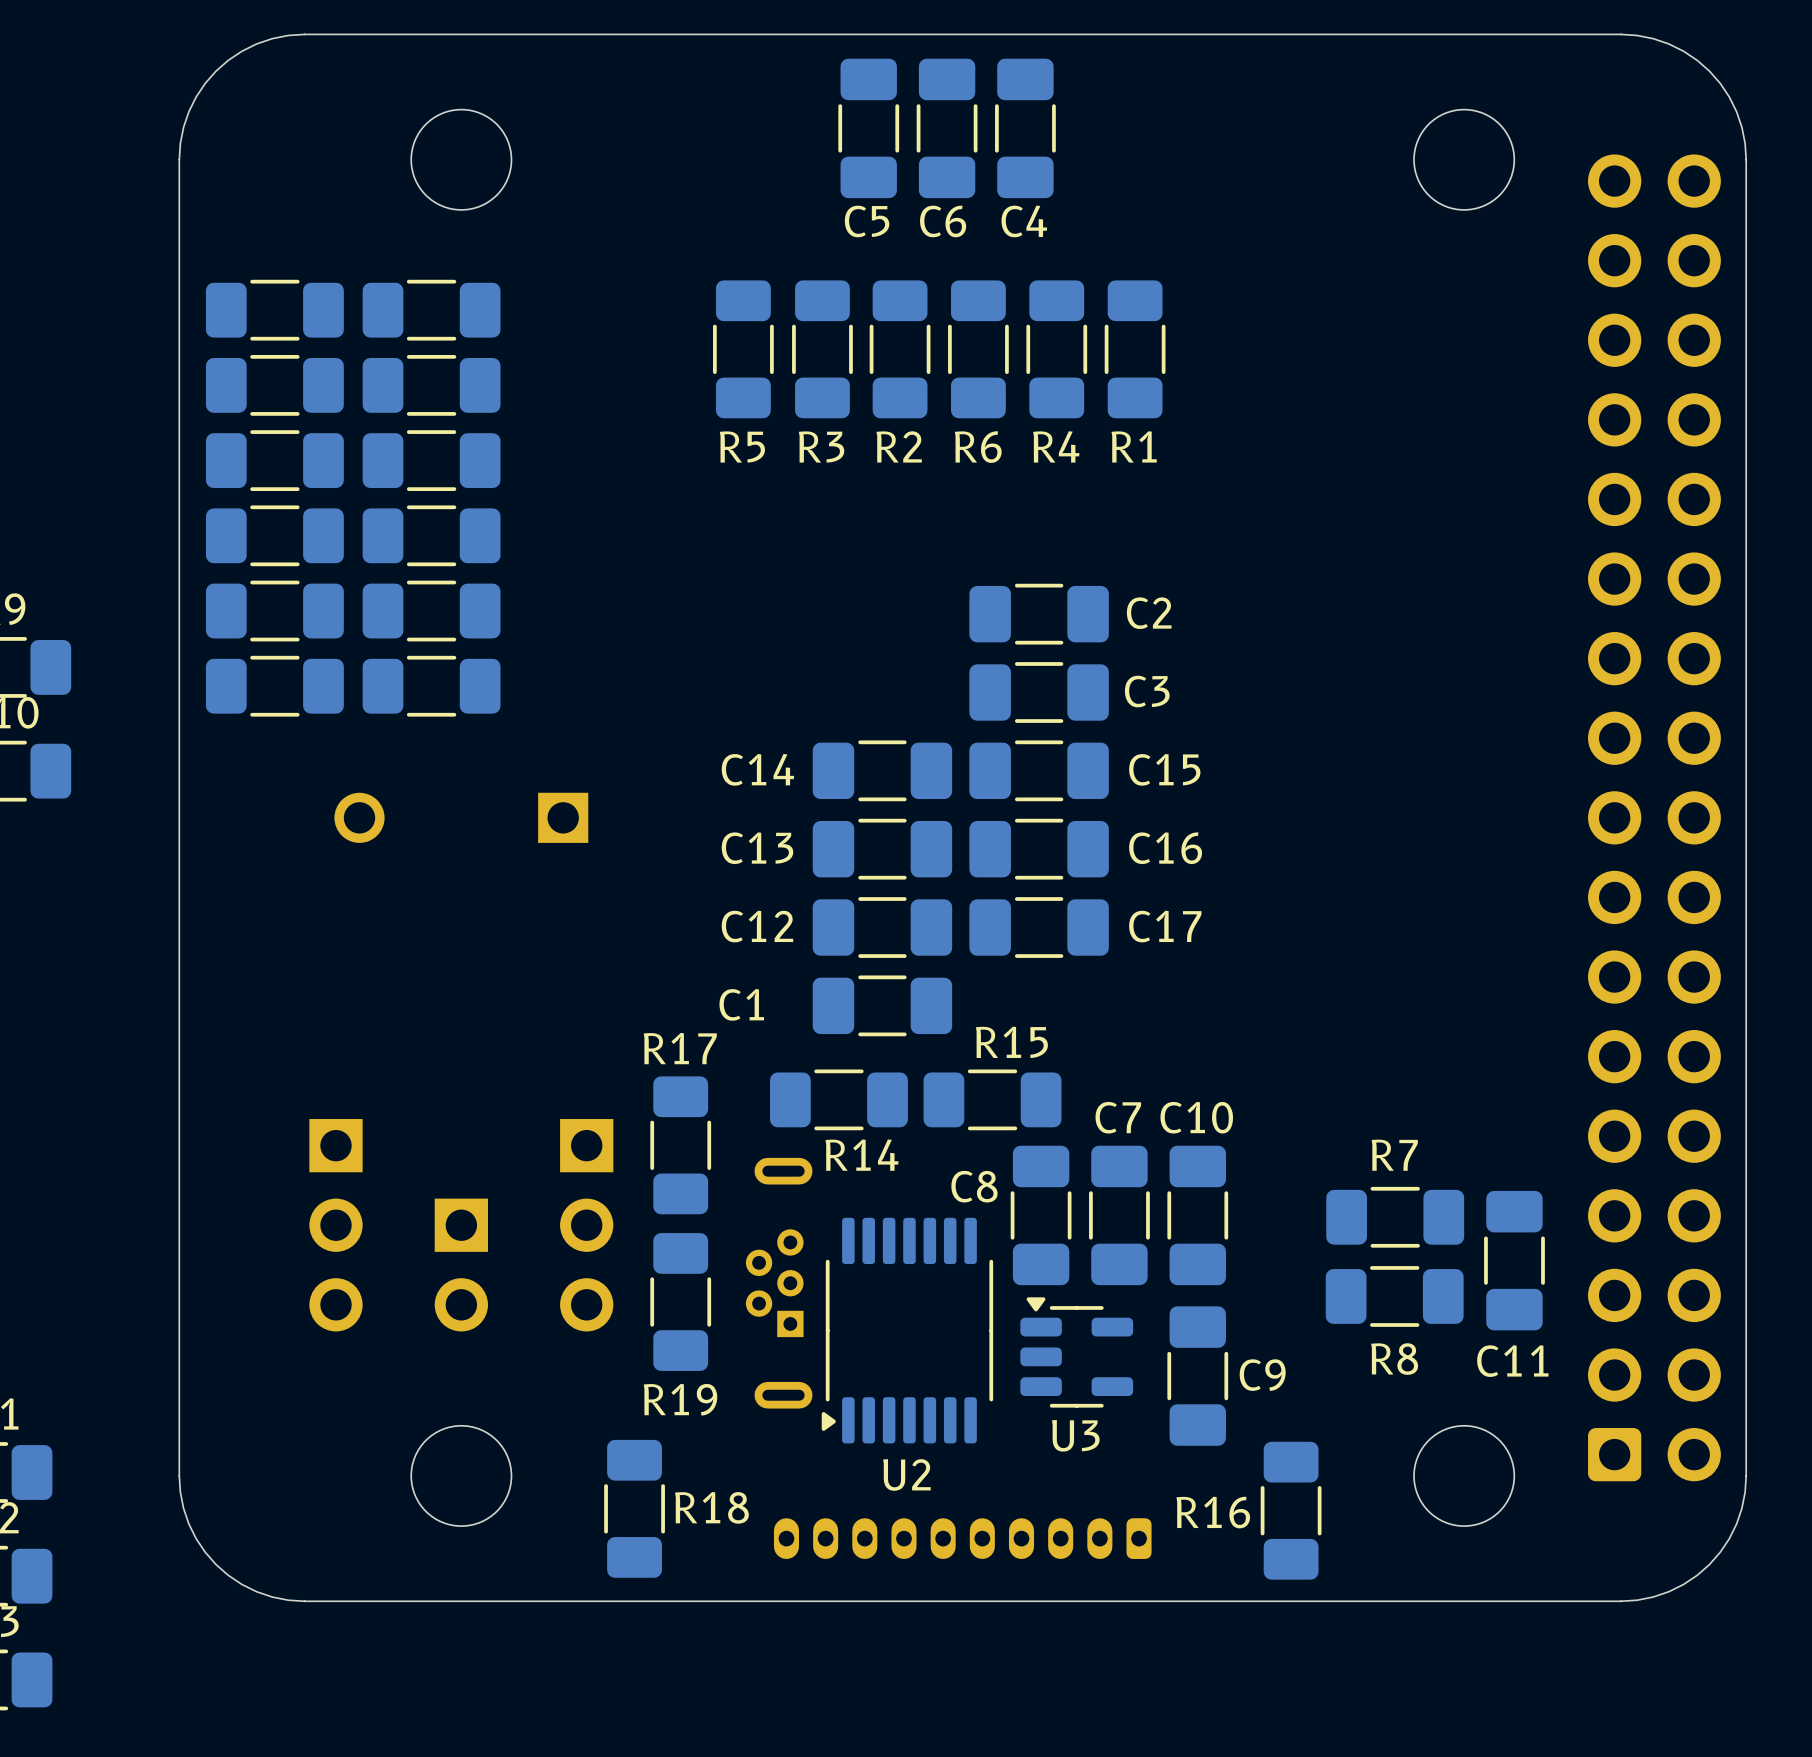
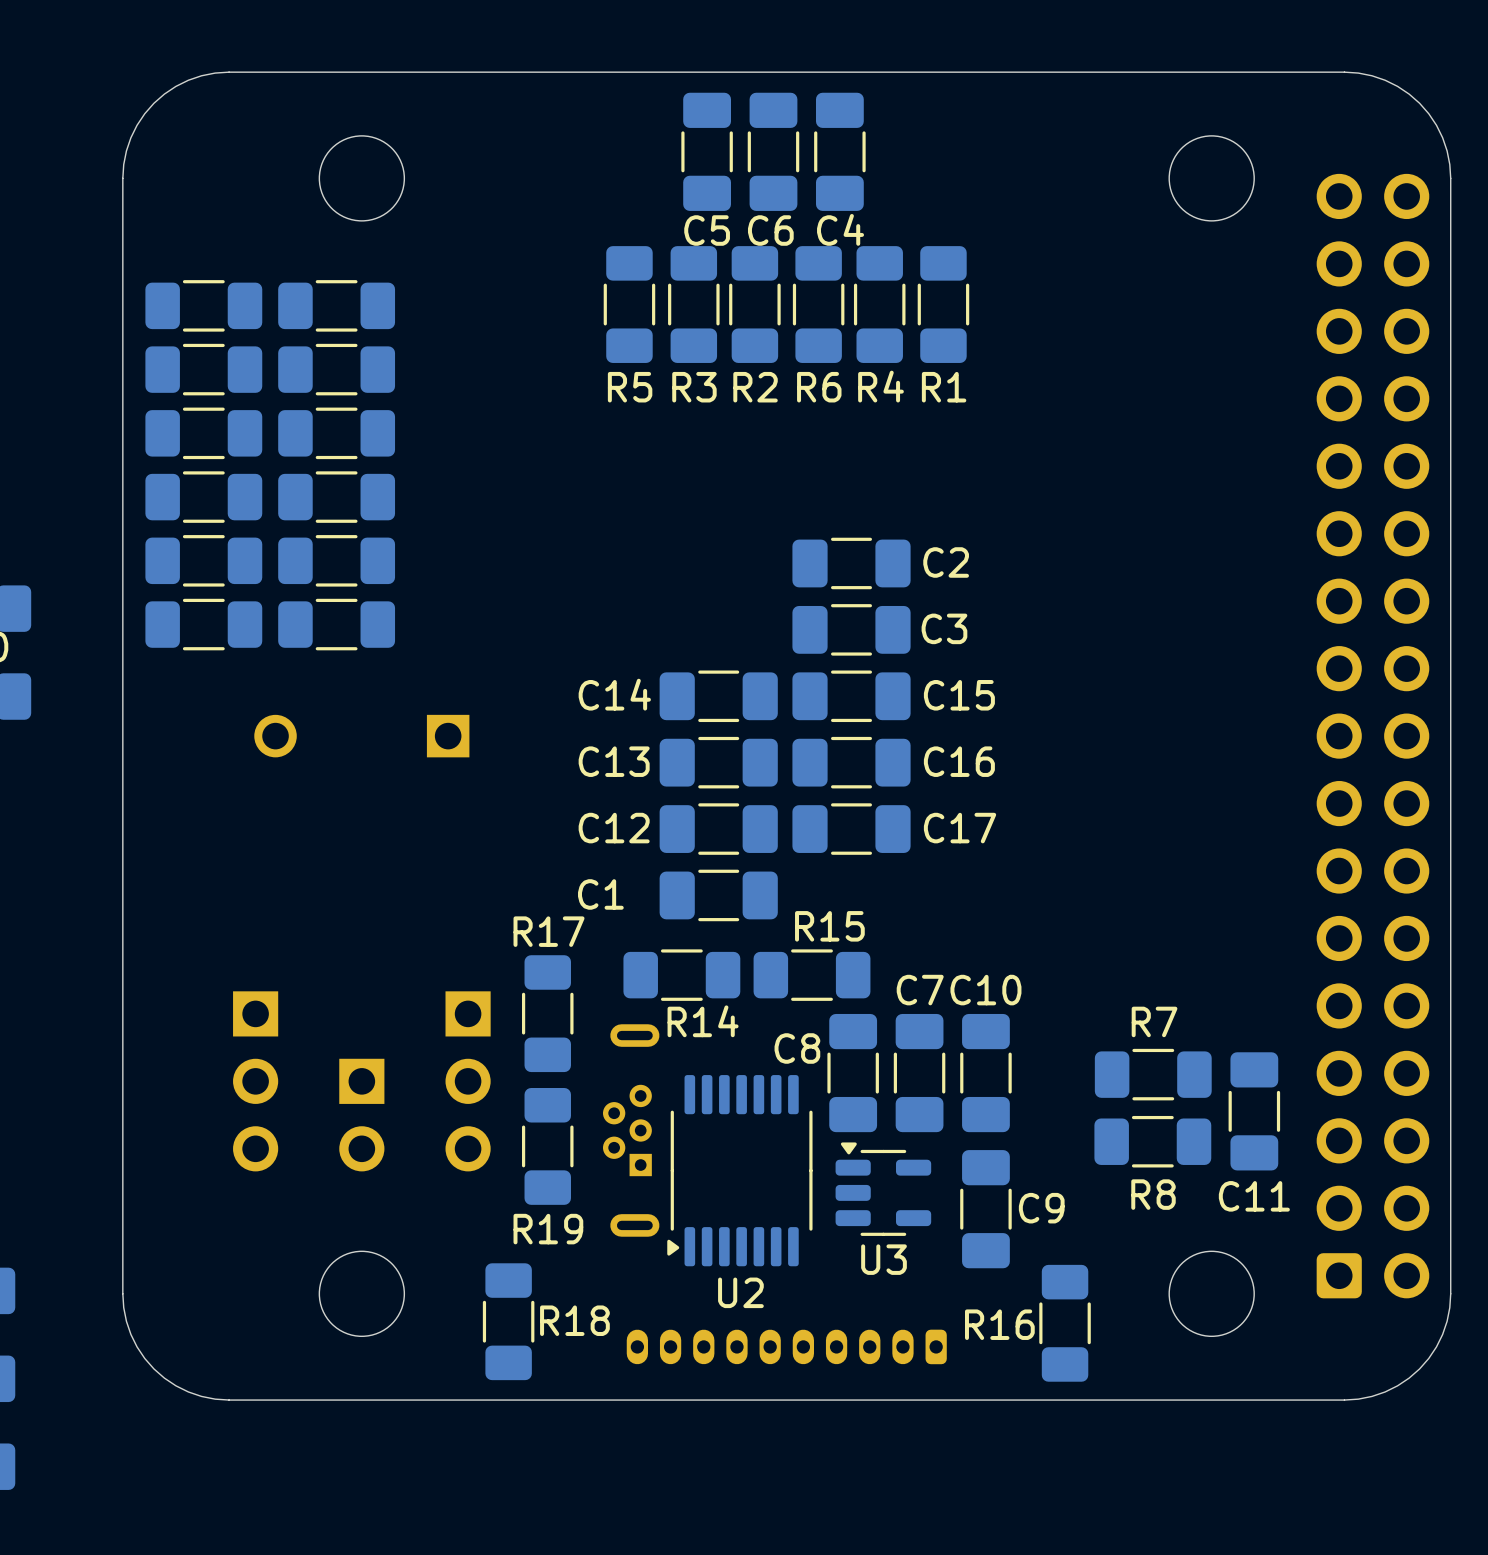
R5 position: (743, 349) -> (629, 304)
R3 position: (822, 349) -> (693, 304)
R2 position: (900, 349) -> (754, 304)
R6 position: (978, 349) -> (818, 304)
R4 position: (1056, 349) -> (879, 304)
R1 position: (1135, 349) -> (943, 304)

